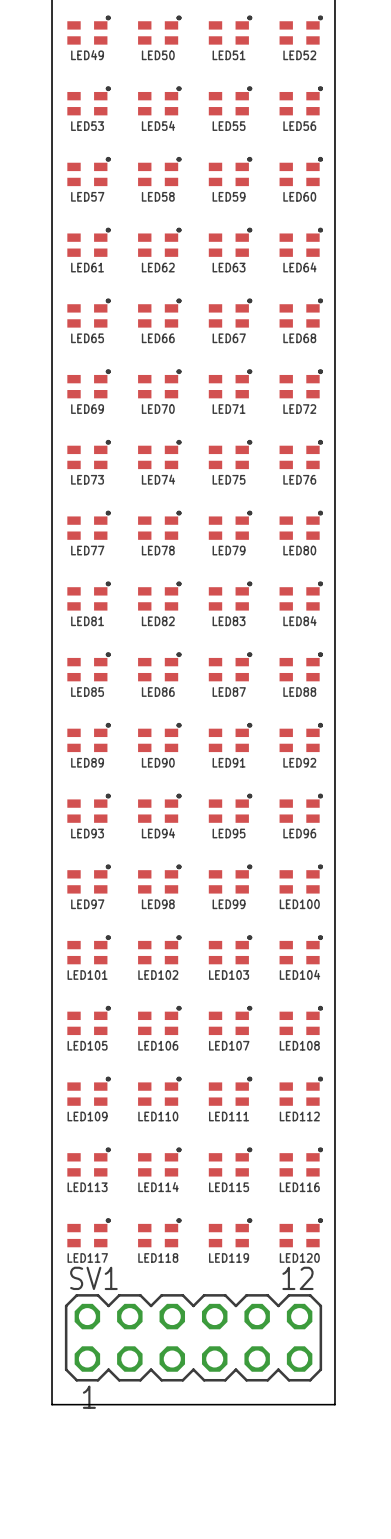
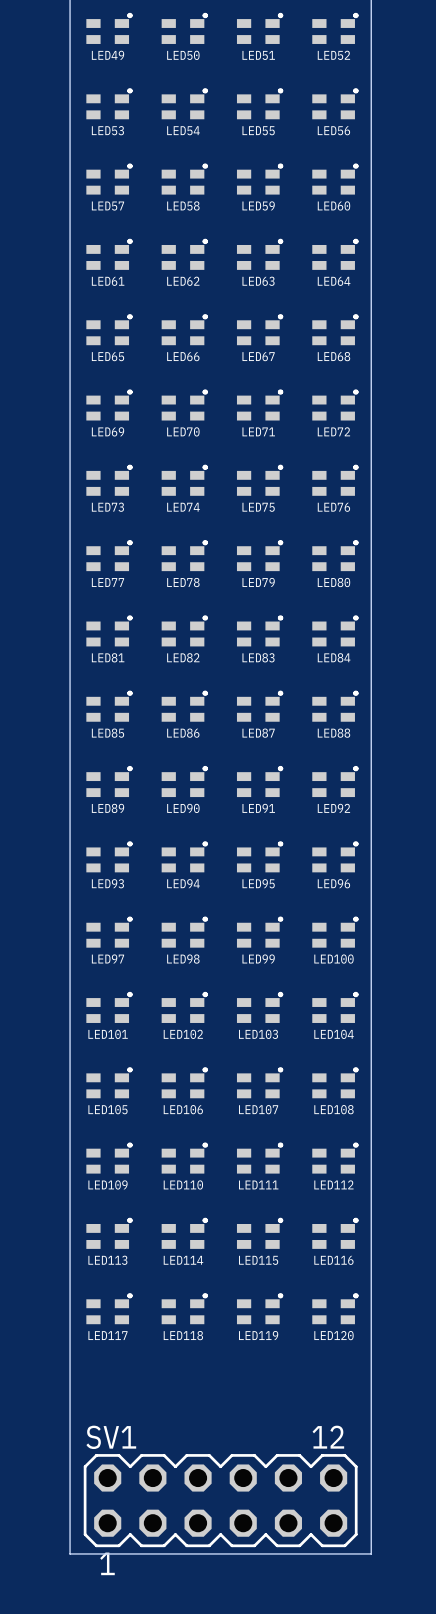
SV1 position: (193, 1337) -> (220, 1500)
board edge: (52, 1404) (334, 1404) -> (70, 1491) (70, 1553) (371, 1553) (371, 1491)

